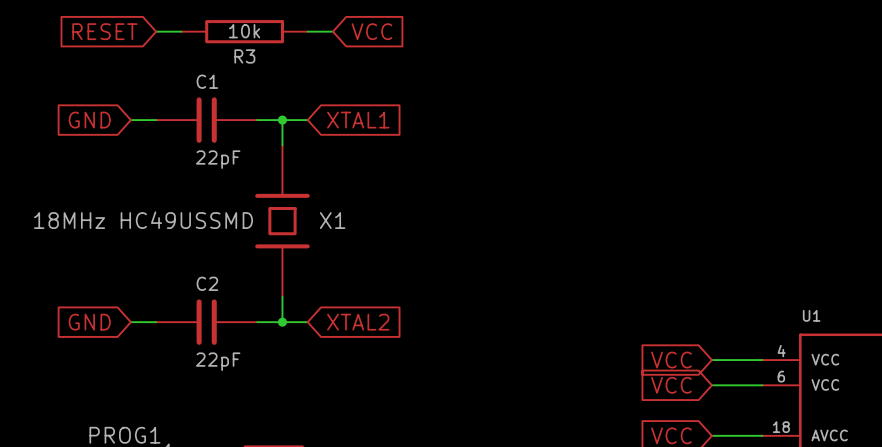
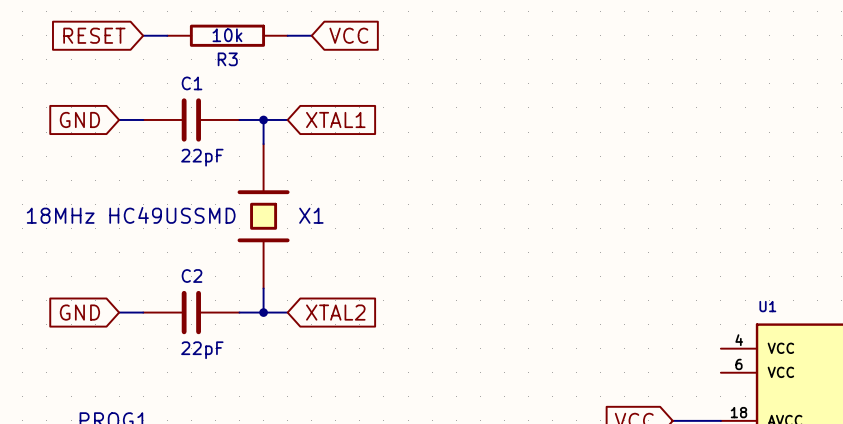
global label: VCC (671, 360) -> none
wire: (711, 360) (762, 360) -> none
global label: VCC (671, 385) -> none
wire: (711, 385) (762, 385) -> none

